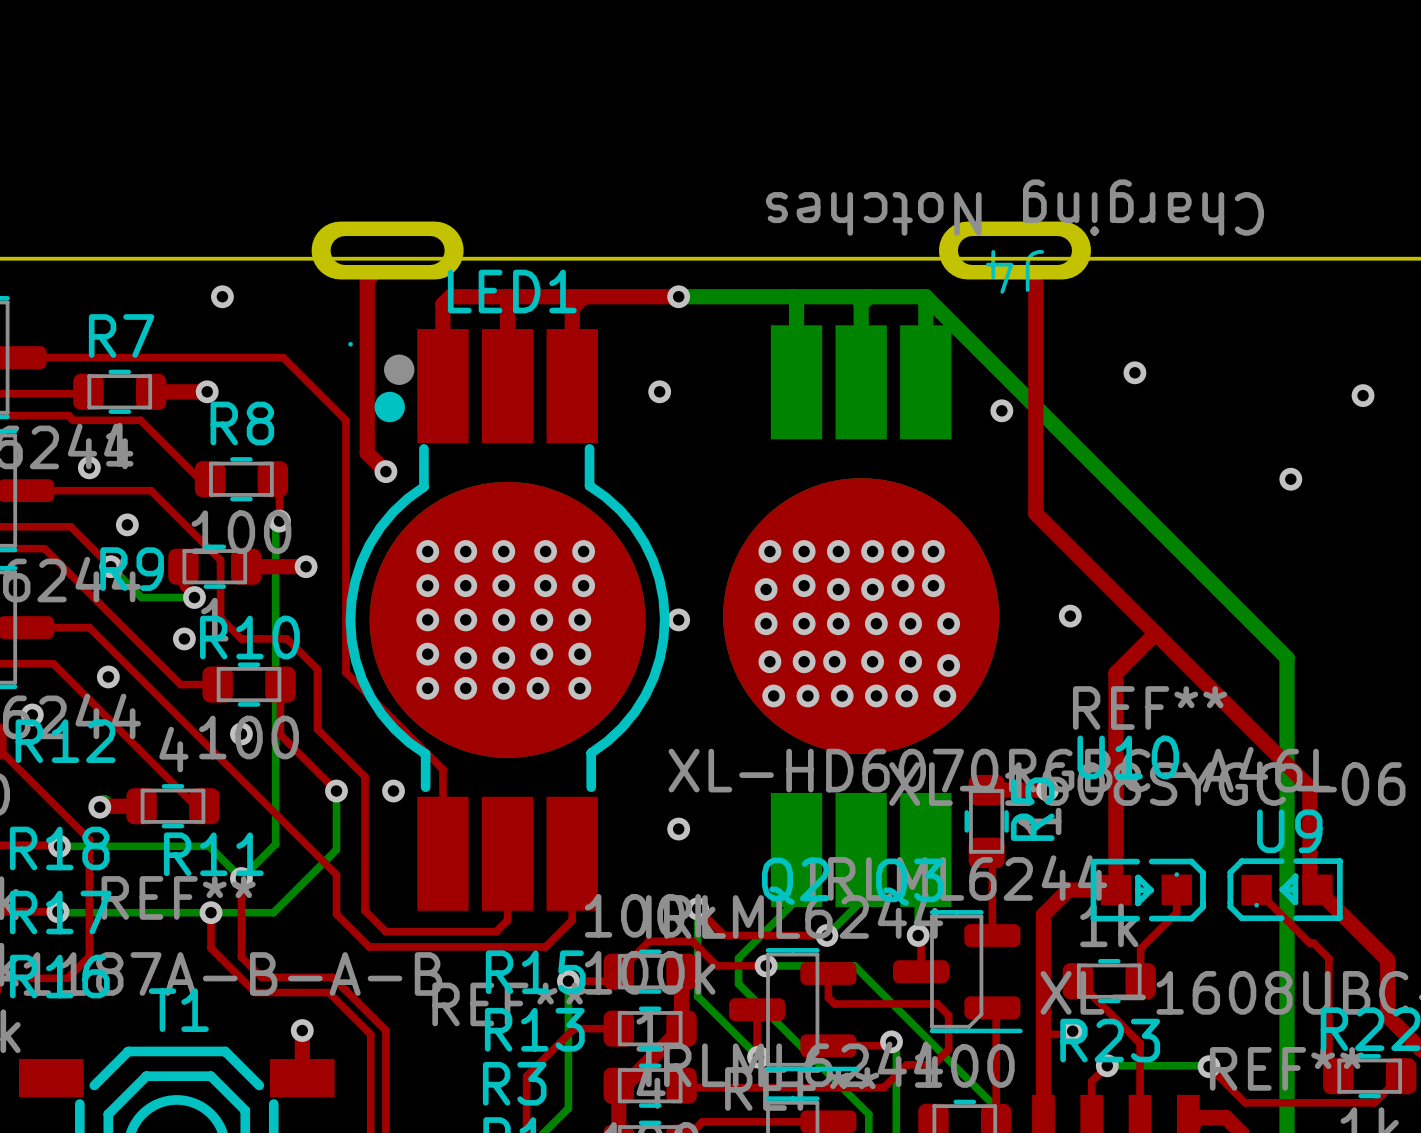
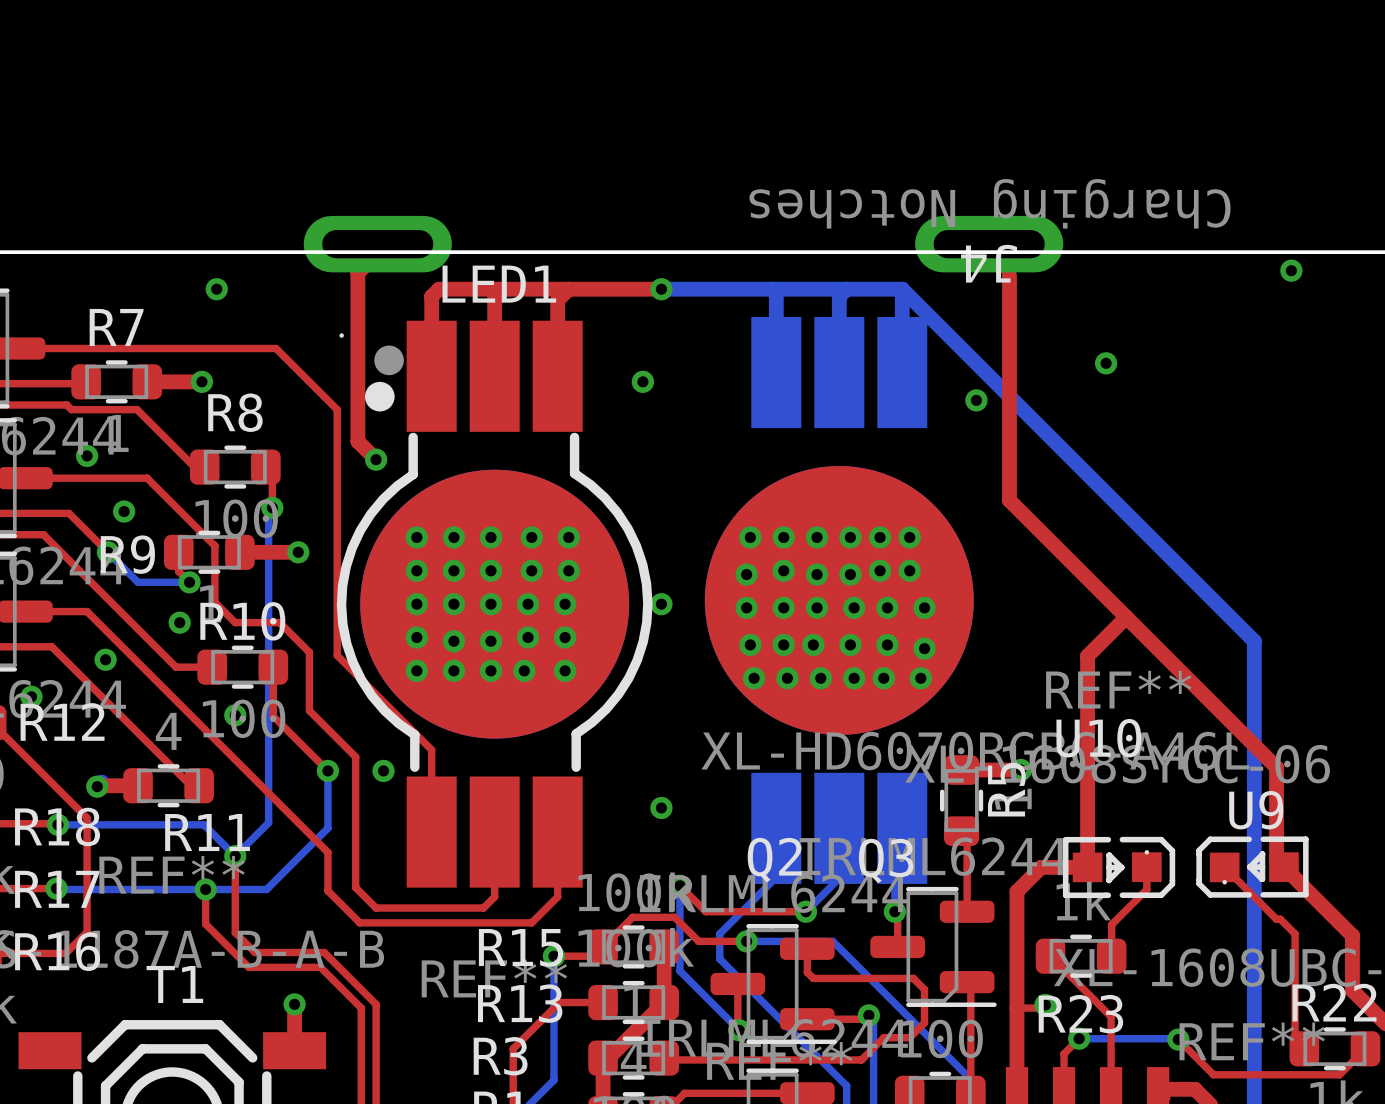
via: none -> (1291, 270)
via: (1363, 395) -> none
via: (1290, 479) -> none
via: (1070, 616) -> none

